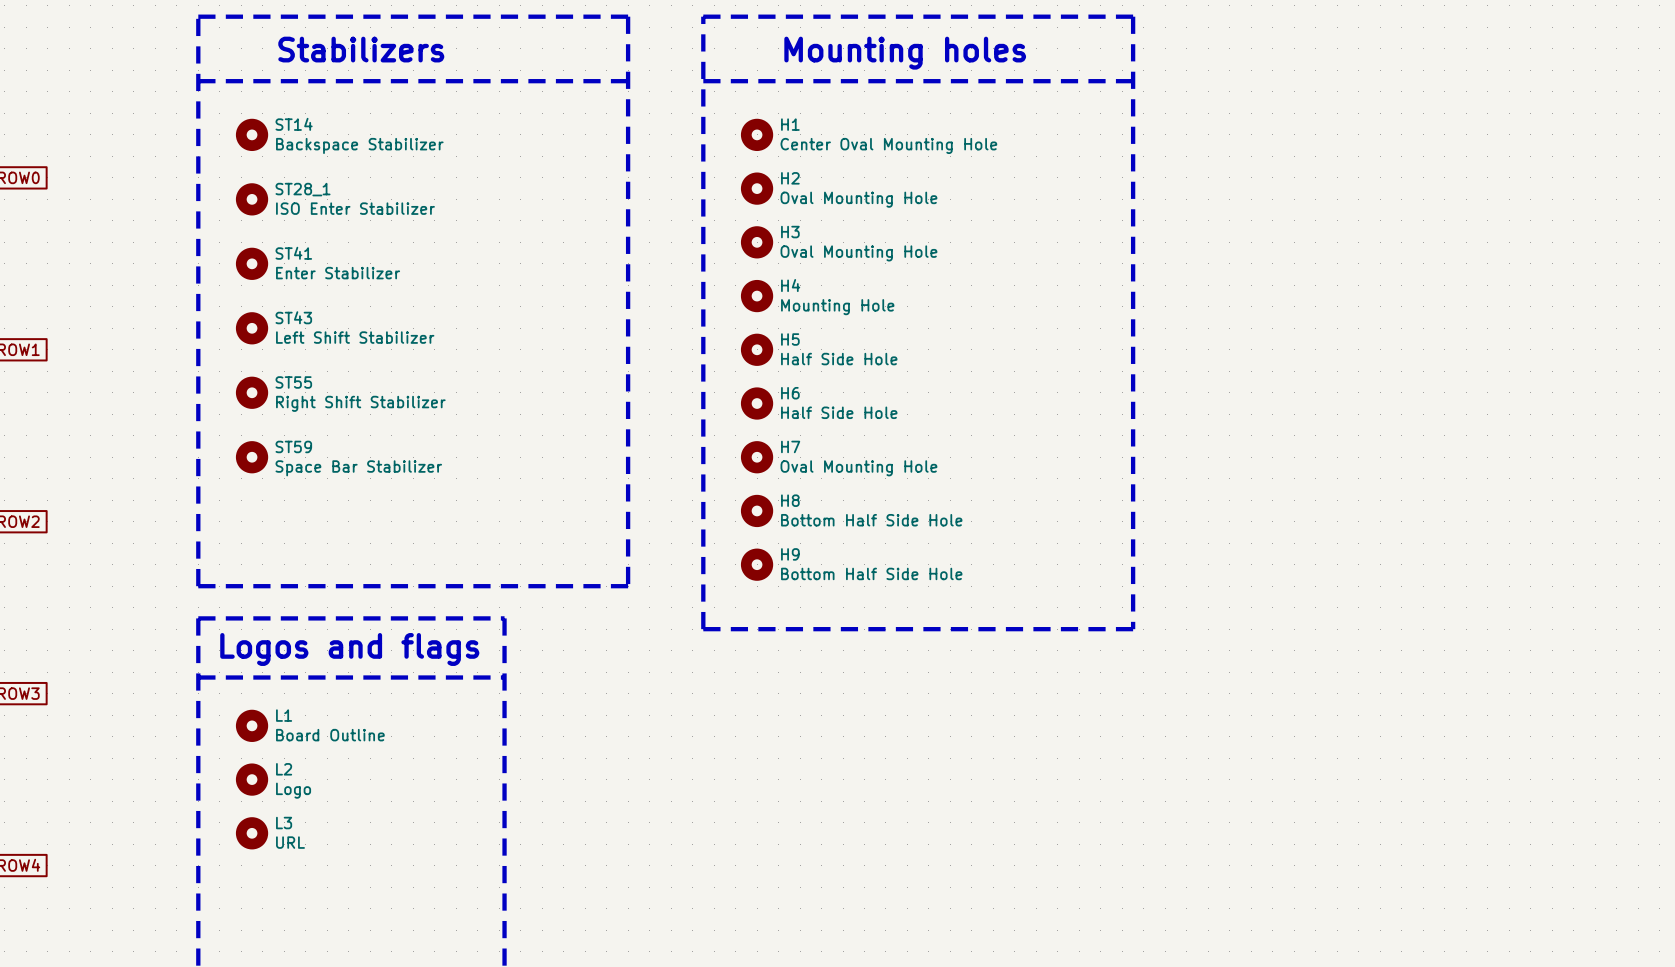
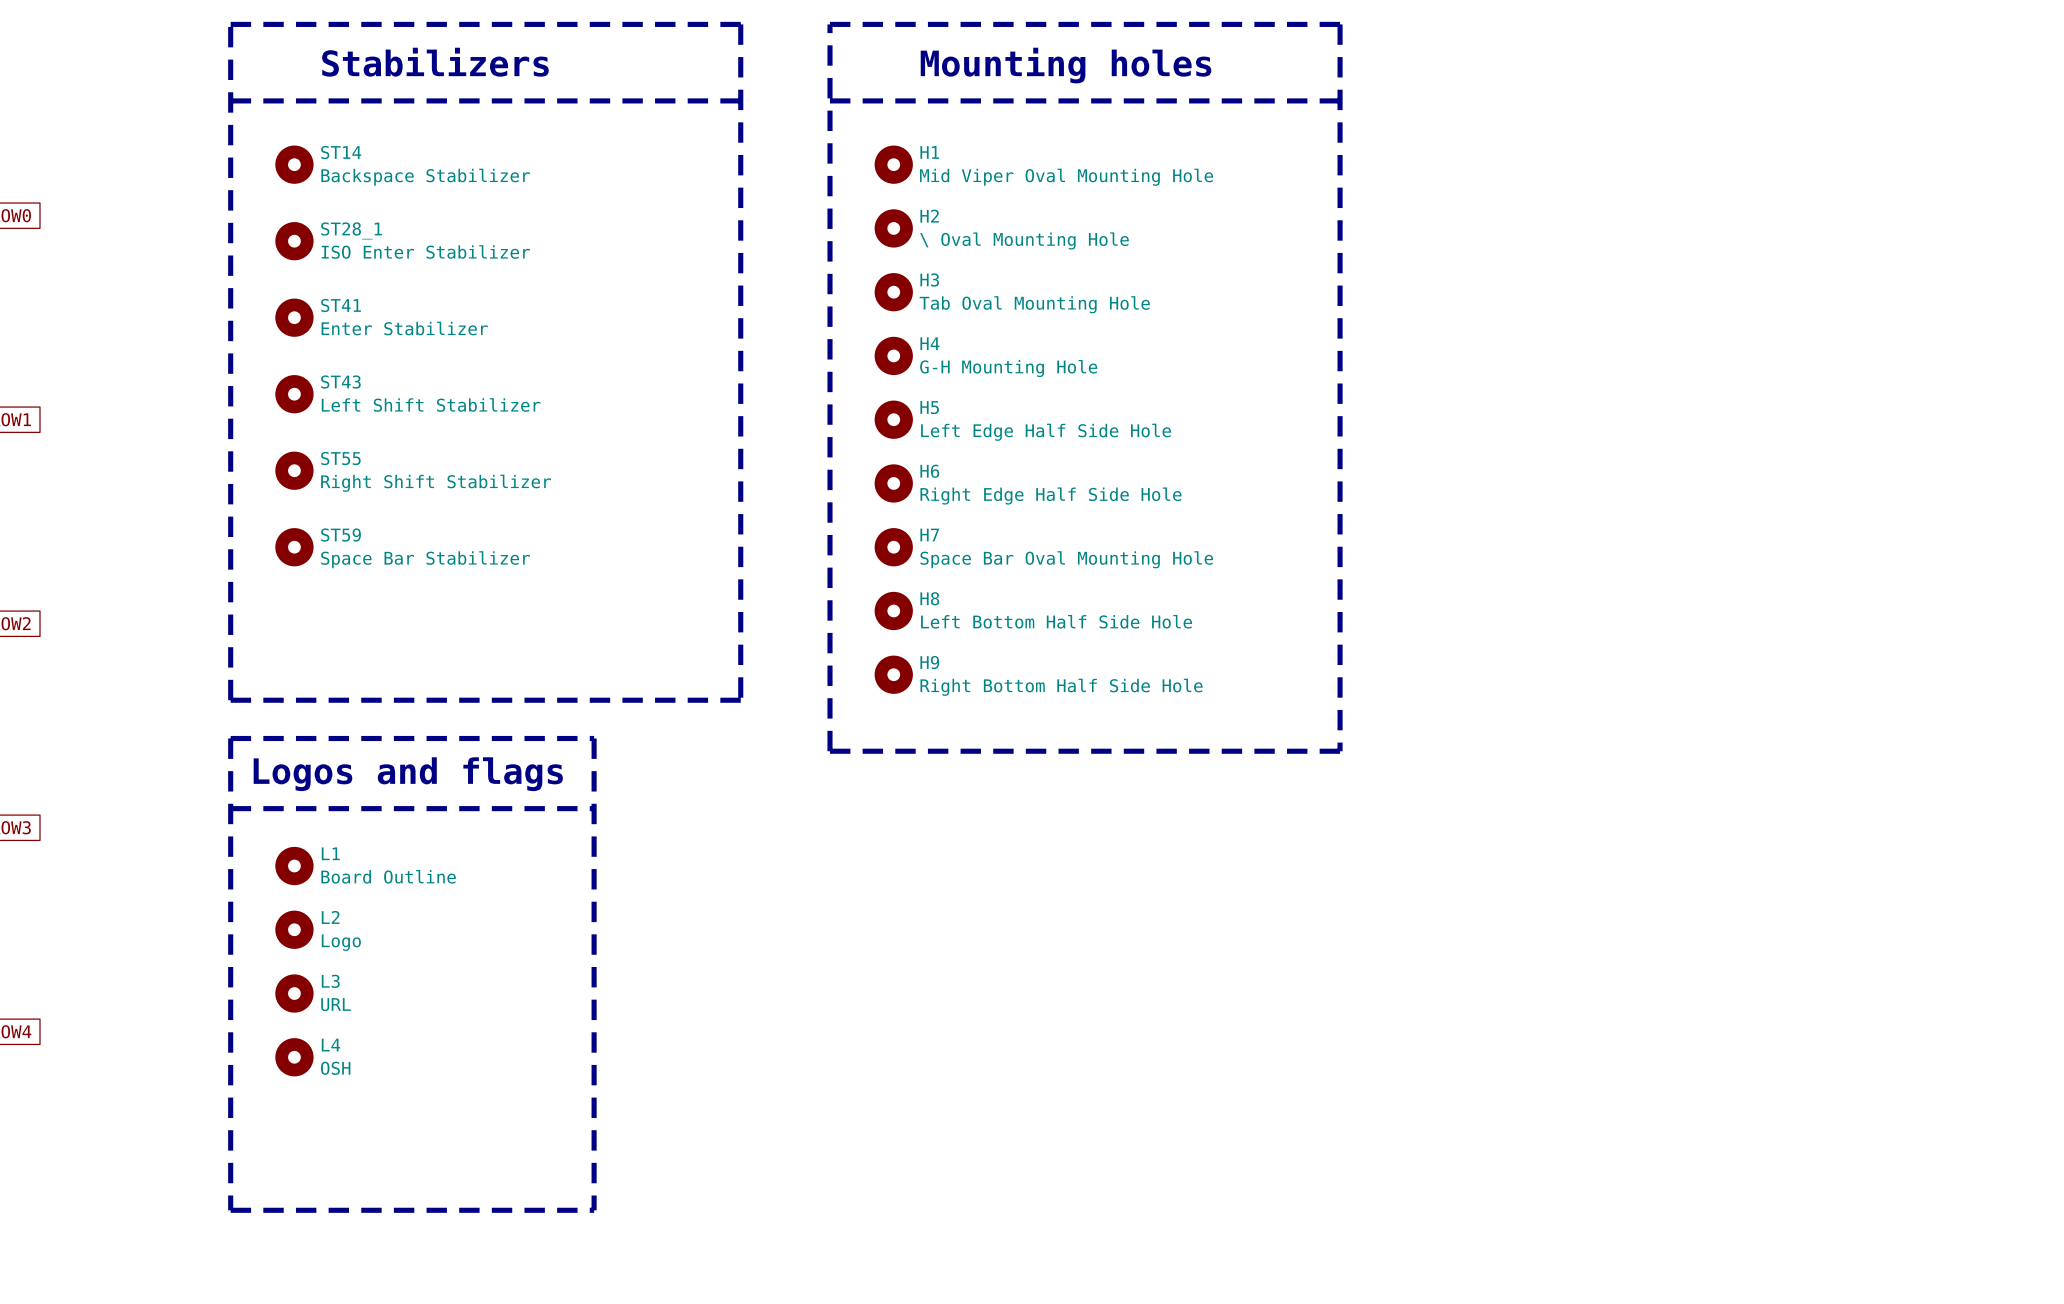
H1 value: Center Oval Mounting Hole (888, 145) -> Mid Viper Oval Mounting Hole (1066, 177)
H2 value: Oval Mounting Hole (858, 199) -> \ Oval Mounting Hole (1024, 240)
H3 value: Oval Mounting Hole (858, 253) -> Tab Oval Mounting Hole (1034, 304)
H4 value: Mounting Hole (837, 307) -> G-H Mounting Hole (1008, 368)
H5 value: Half Side Hole (839, 359) -> Left Edge Half Side Hole (1046, 432)
H6 value: Half Side Hole (839, 412) -> Right Edge Half Side Hole (1050, 496)
H7 value: Oval Mounting Hole (858, 468) -> Space Bar Oval Mounting Hole (1066, 559)
H8 value: Bottom Half Side Hole (871, 520) -> Left Bottom Half Side Hole (1056, 621)
H9 value: Bottom Half Side Hole (871, 573) -> Right Bottom Half Side Hole (1061, 687)
L4: none -> OSH (294, 1057)

